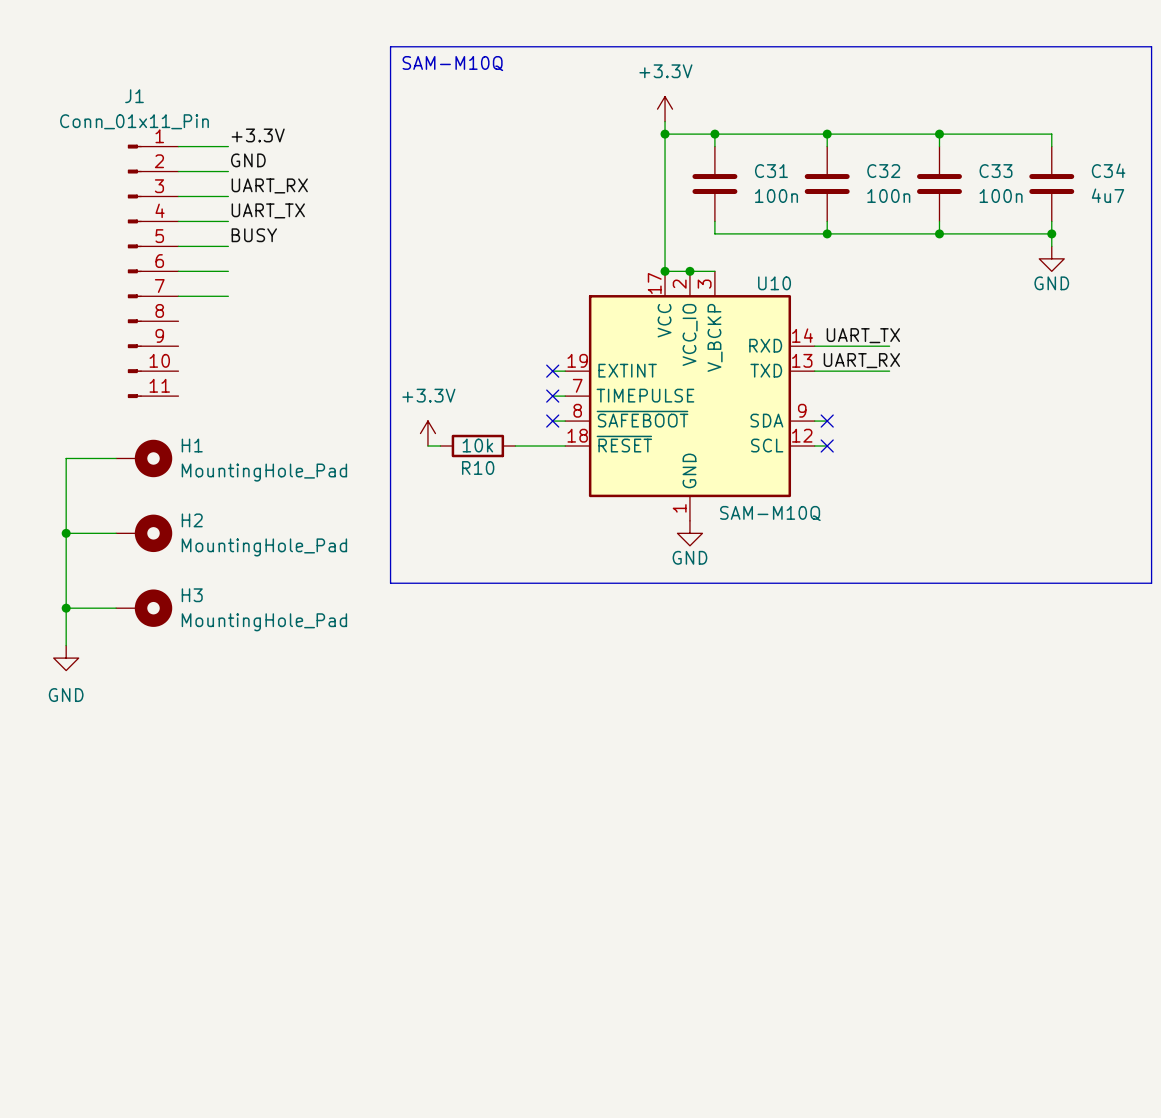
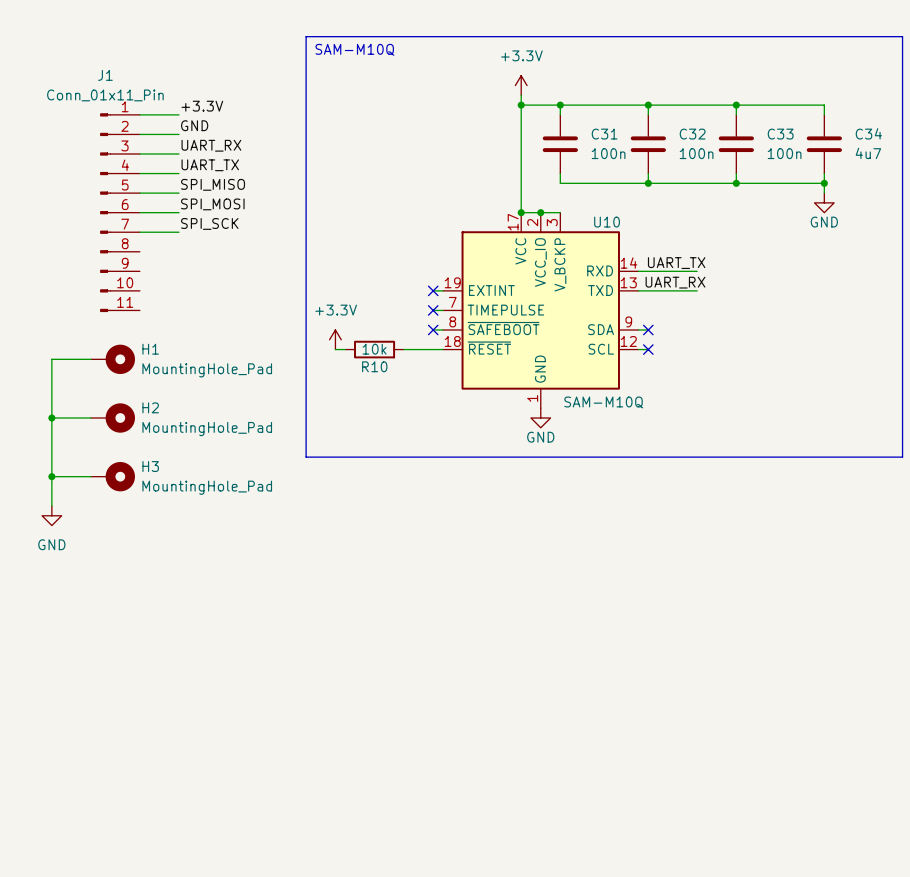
label: BUSY (254, 235) -> SPI_MISO (213, 184)
label: none -> SPI_MOSI (212, 204)
label: none -> SPI_SCK (209, 223)

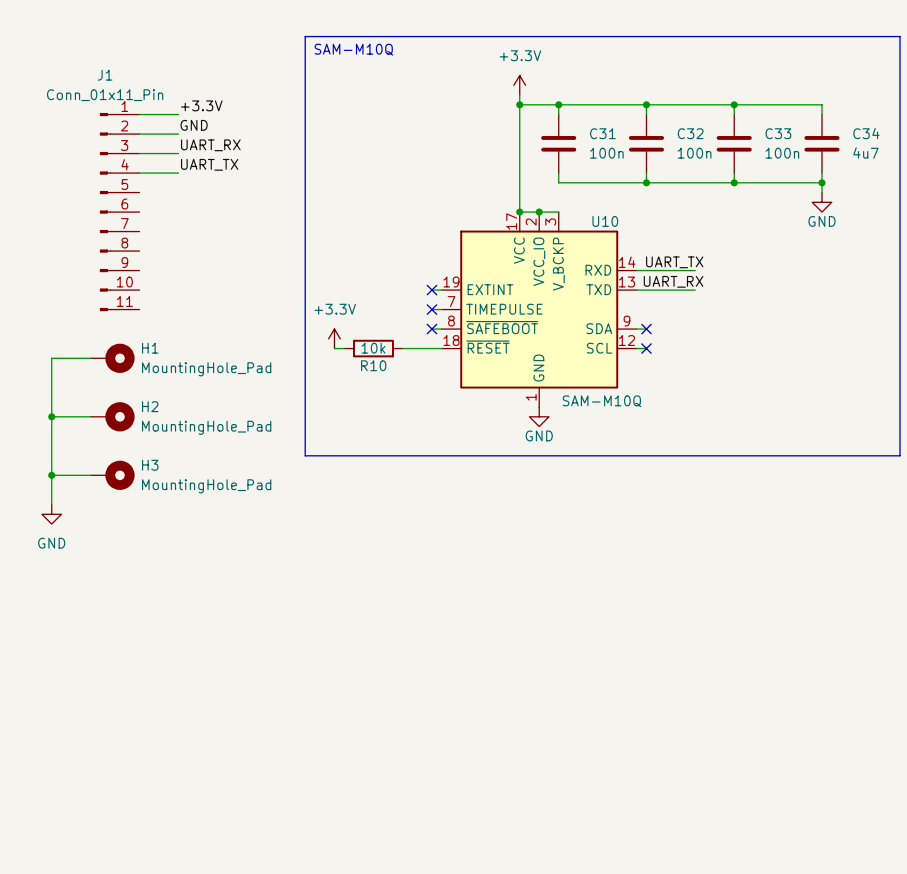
label: SPI_MISO (213, 184) -> none
wire: (139, 193) (178, 193) -> none
label: SPI_MOSI (212, 204) -> none
wire: (139, 212) (178, 212) -> none
label: SPI_SCK (209, 223) -> none
wire: (139, 232) (178, 232) -> none

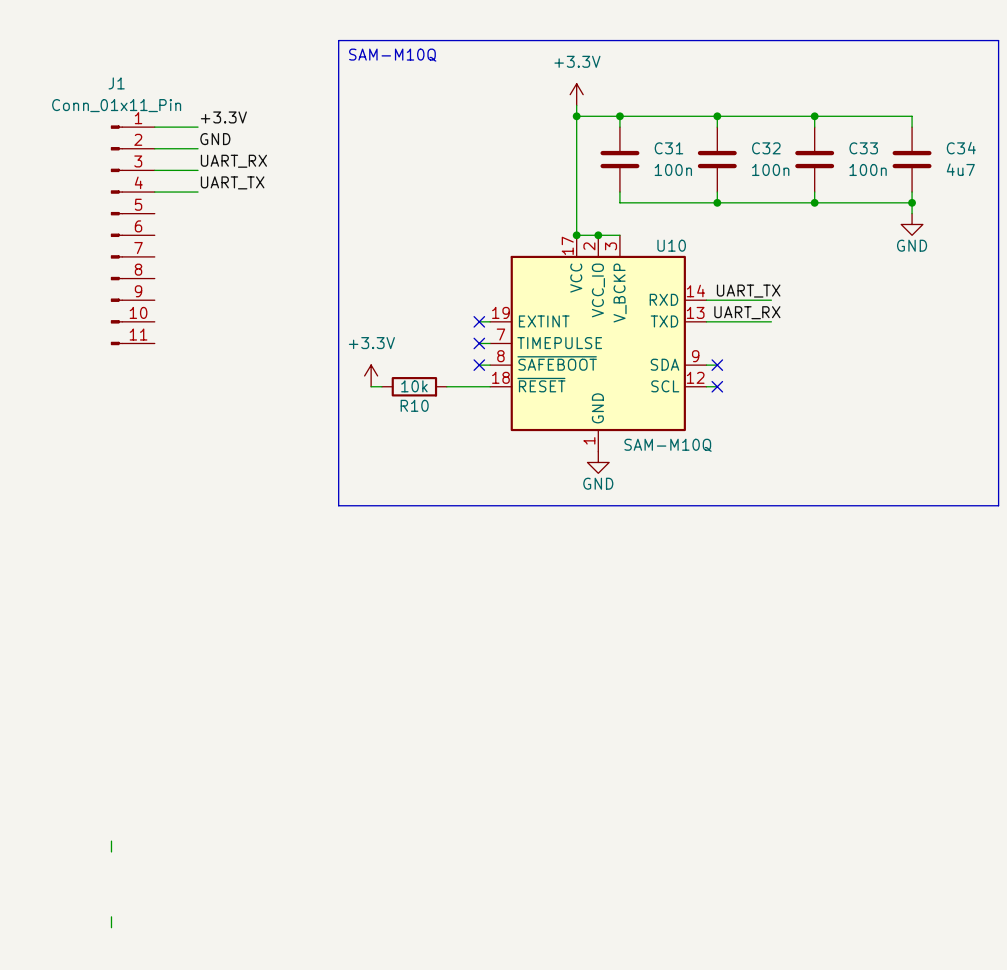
wire: (90, 358) (51, 358) (51, 504) -> none
H1: MountingHole_Pad (112, 358) -> none
wire: (51, 416) (90, 416) -> none
junction: (51, 416) -> none
H2: MountingHole_Pad (112, 416) -> none
wire: (51, 475) (90, 475) -> none
junction: (51, 475) -> none
H3: MountingHole_Pad (112, 475) -> none
power symbol: GND (51, 514) -> none
wire: none -> (111, 841) (111, 851)
wire: none -> (111, 916) (111, 927)

